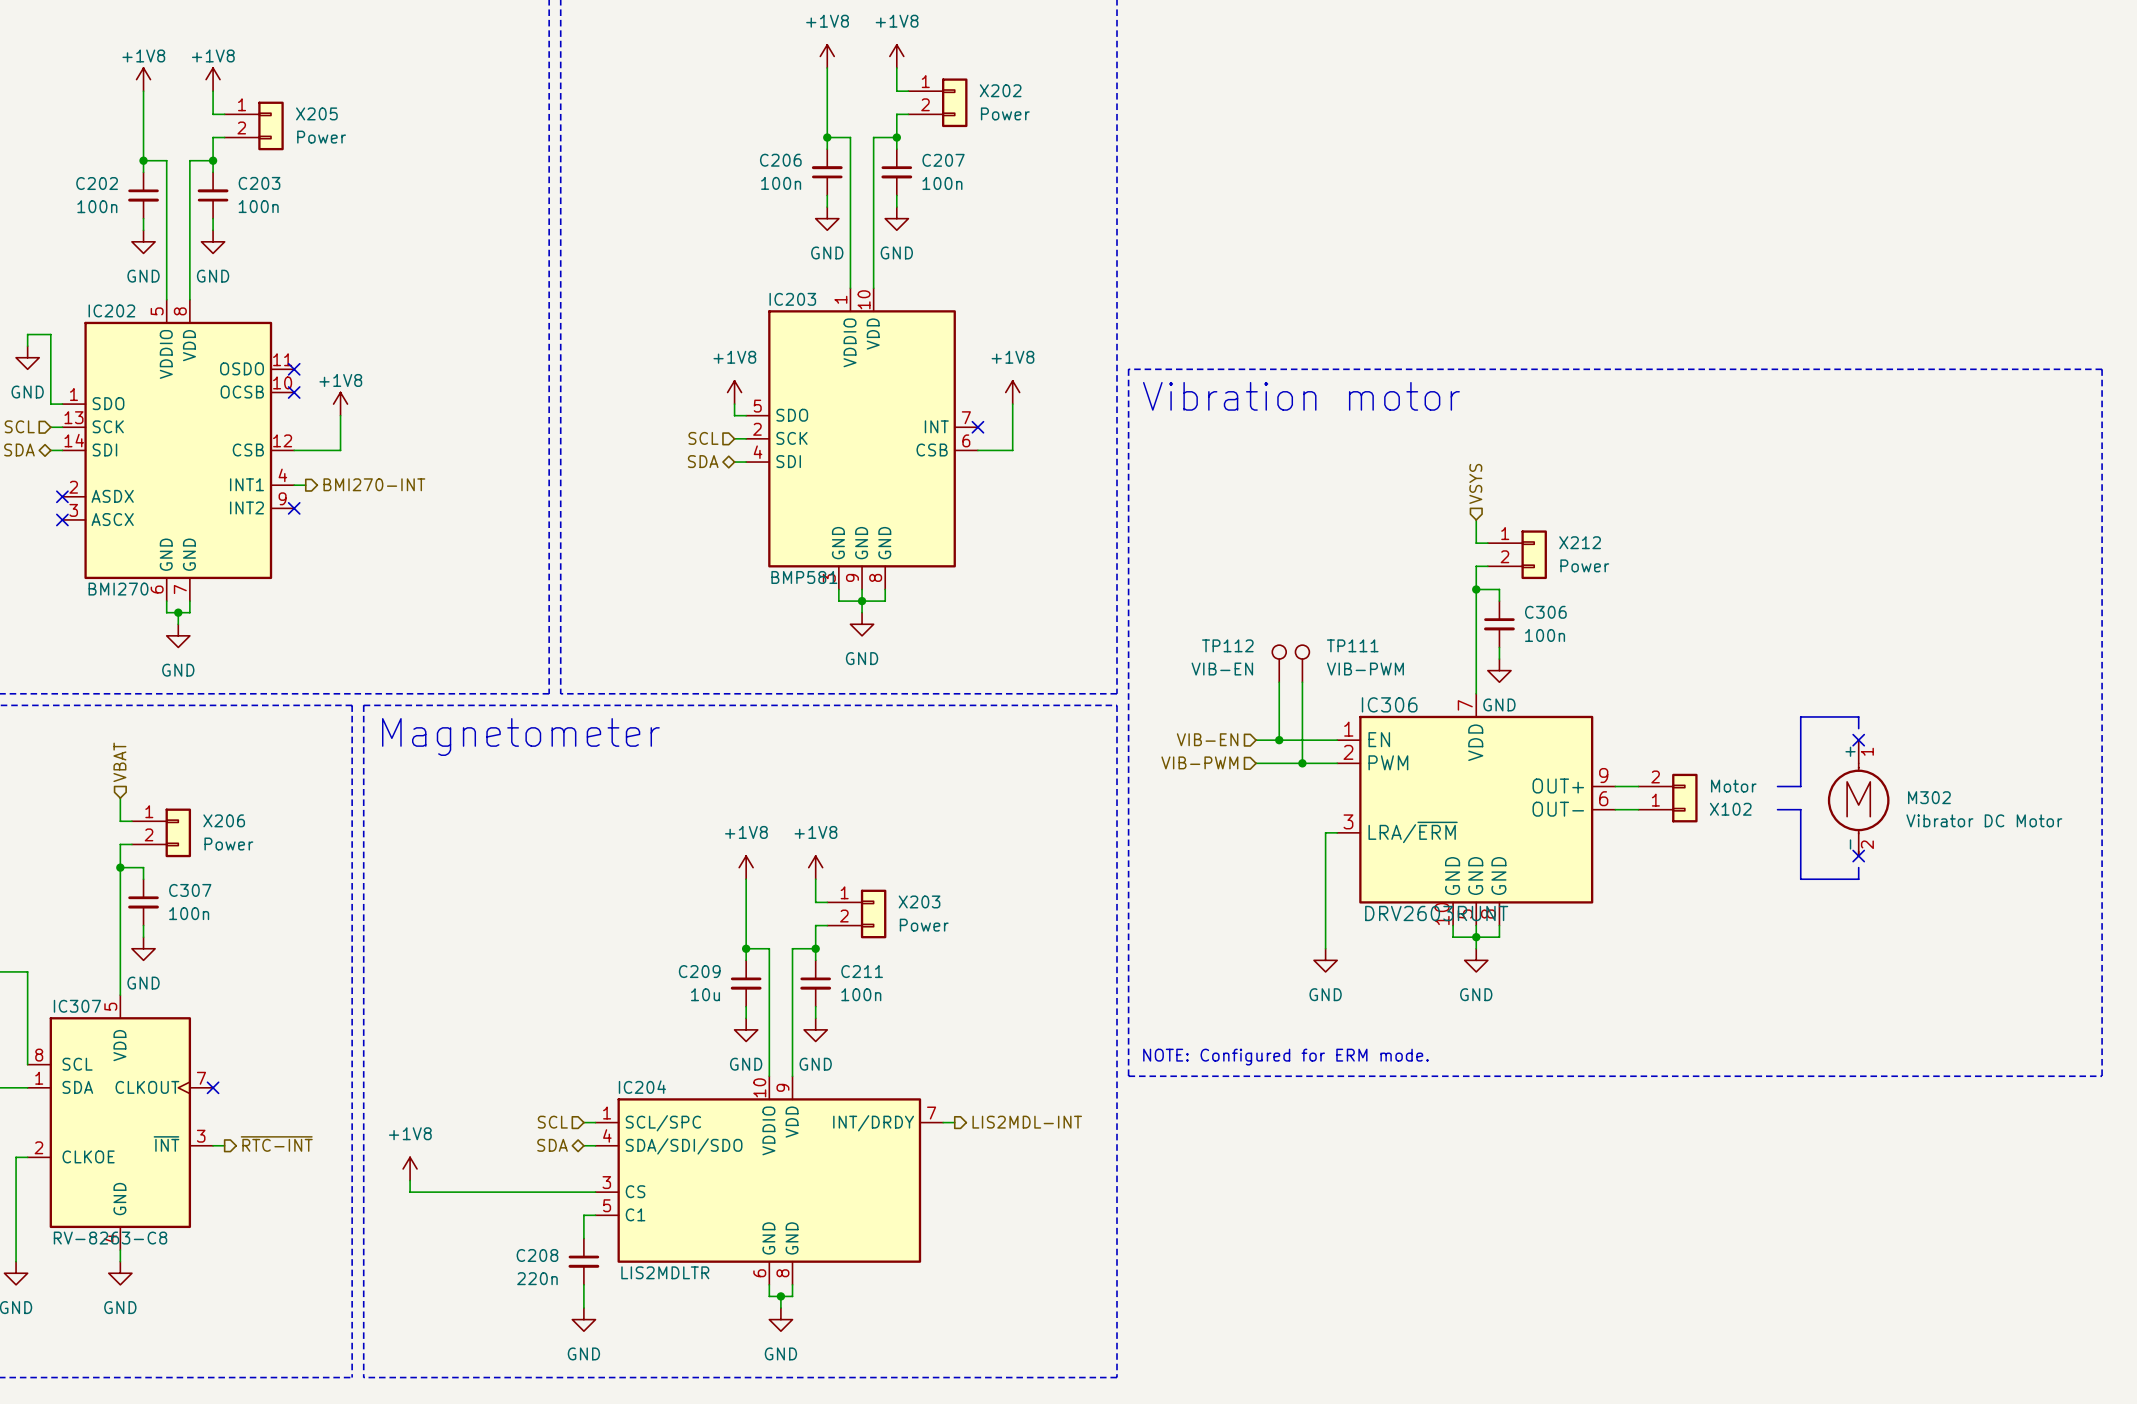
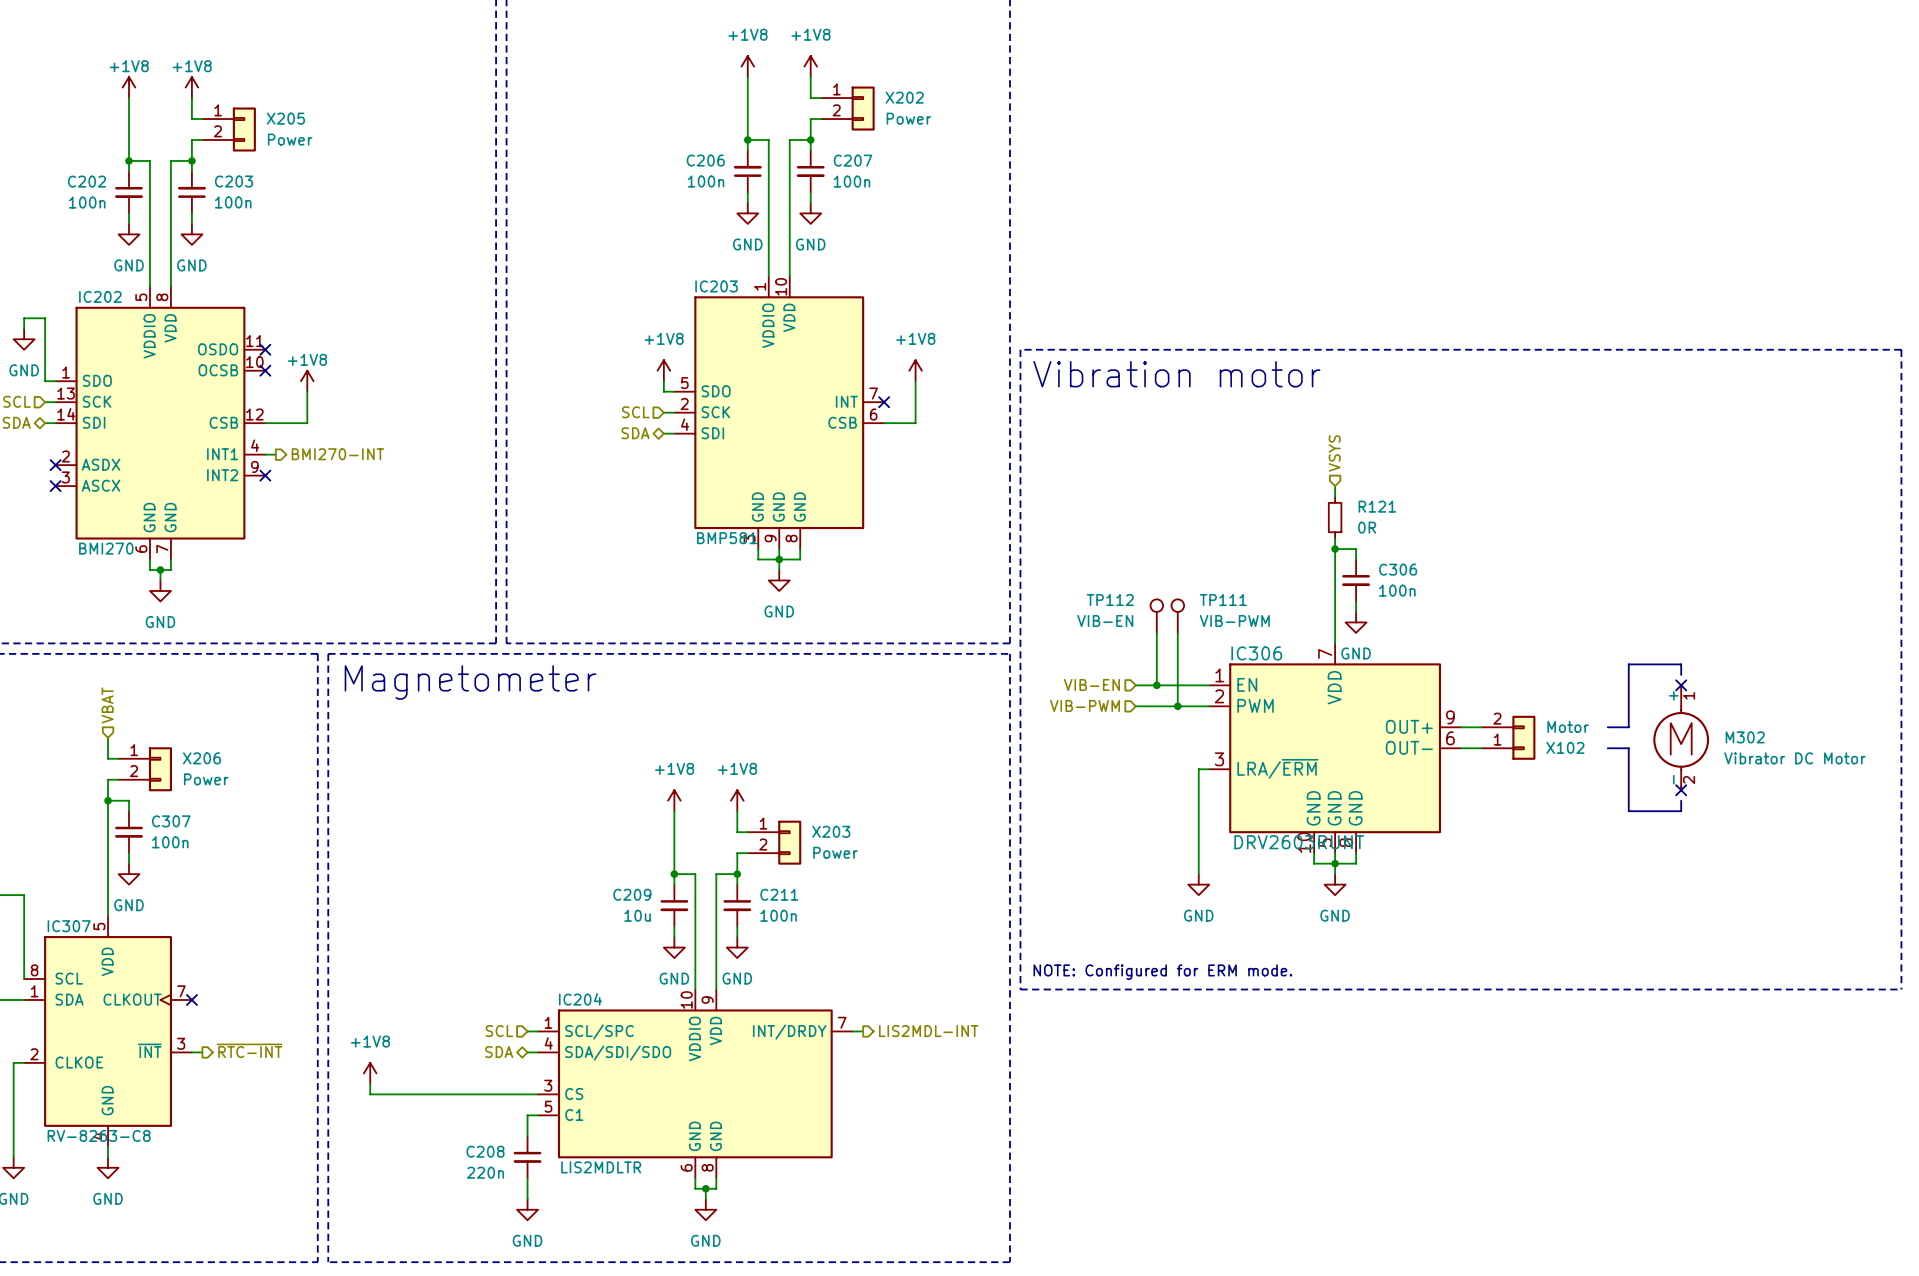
wire: (1476, 531) (1476, 543) (1487, 543) -> none
R121: none -> 0R (1335, 517)
X212: Power (1517, 554) -> none
wire: (1487, 566) (1476, 566) (1476, 577) -> none

